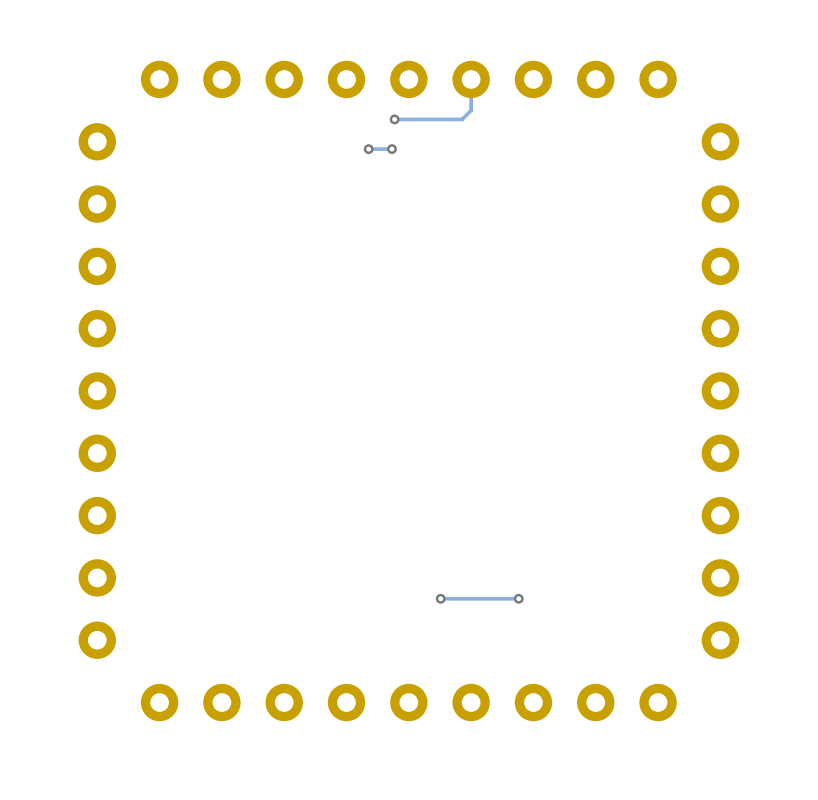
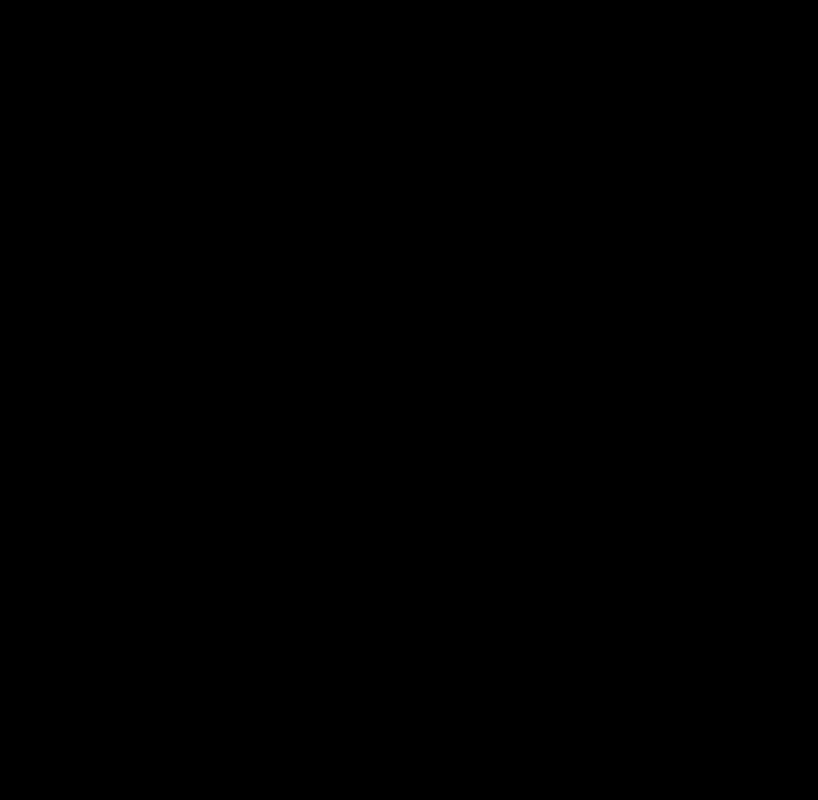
track: (471, 79) (471, 110) (462, 119) (394, 119) -> none
via: (394, 119) -> none
via: (368, 149) -> none
track: (391, 149) (368, 149) -> none
via: (391, 149) -> none
part: (408, 390) -> none
via: (440, 598) -> none
track: (518, 598) (440, 598) -> none
via: (518, 598) -> none

